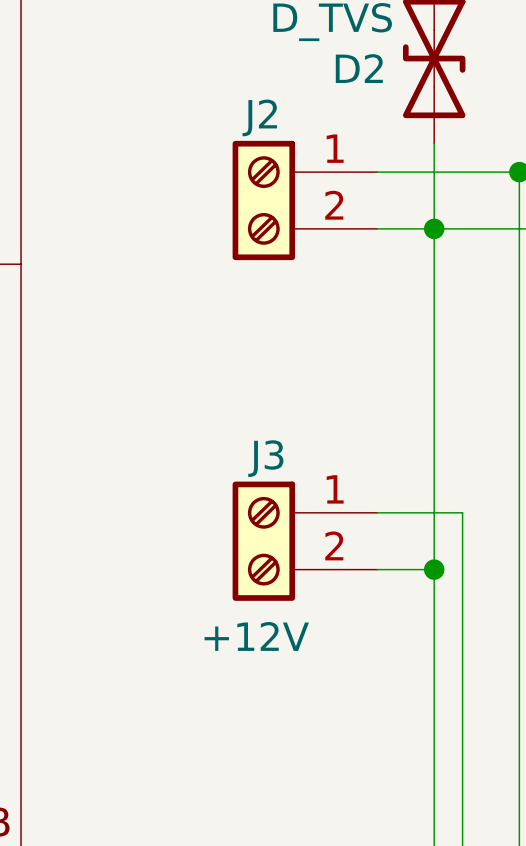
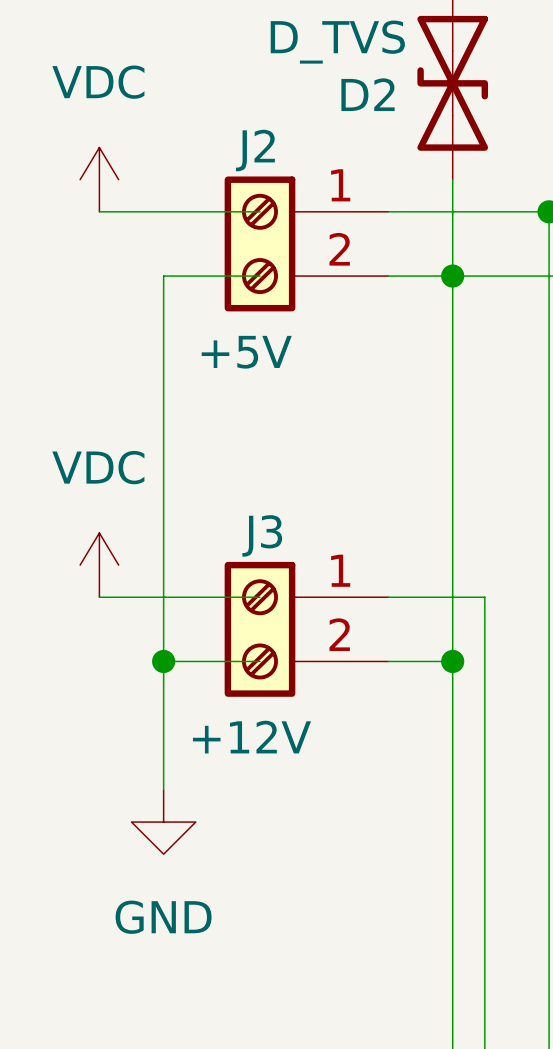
power symbol: none -> VDC (99, 179)
wire: none -> (99, 211) (259, 211)
wire: none -> (259, 276) (163, 276) (163, 789)
J2 value: none -> +5V (246, 352)
power symbol: none -> VDC (99, 565)
wire: none -> (99, 597) (259, 597)
wire: none -> (163, 661) (259, 661)
junction: none -> (163, 661)
power symbol: none -> GND (163, 822)

